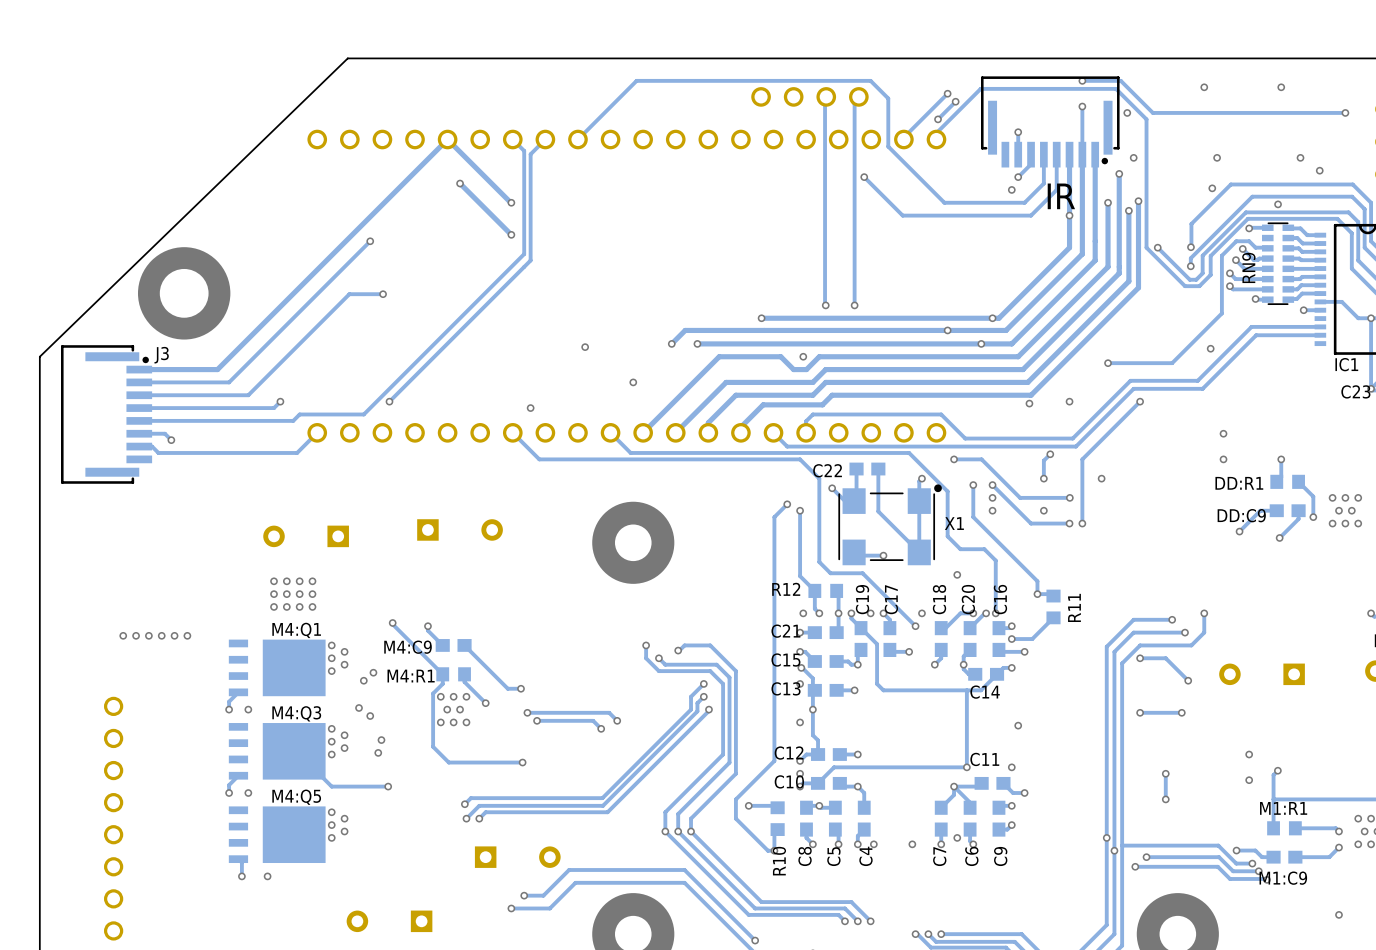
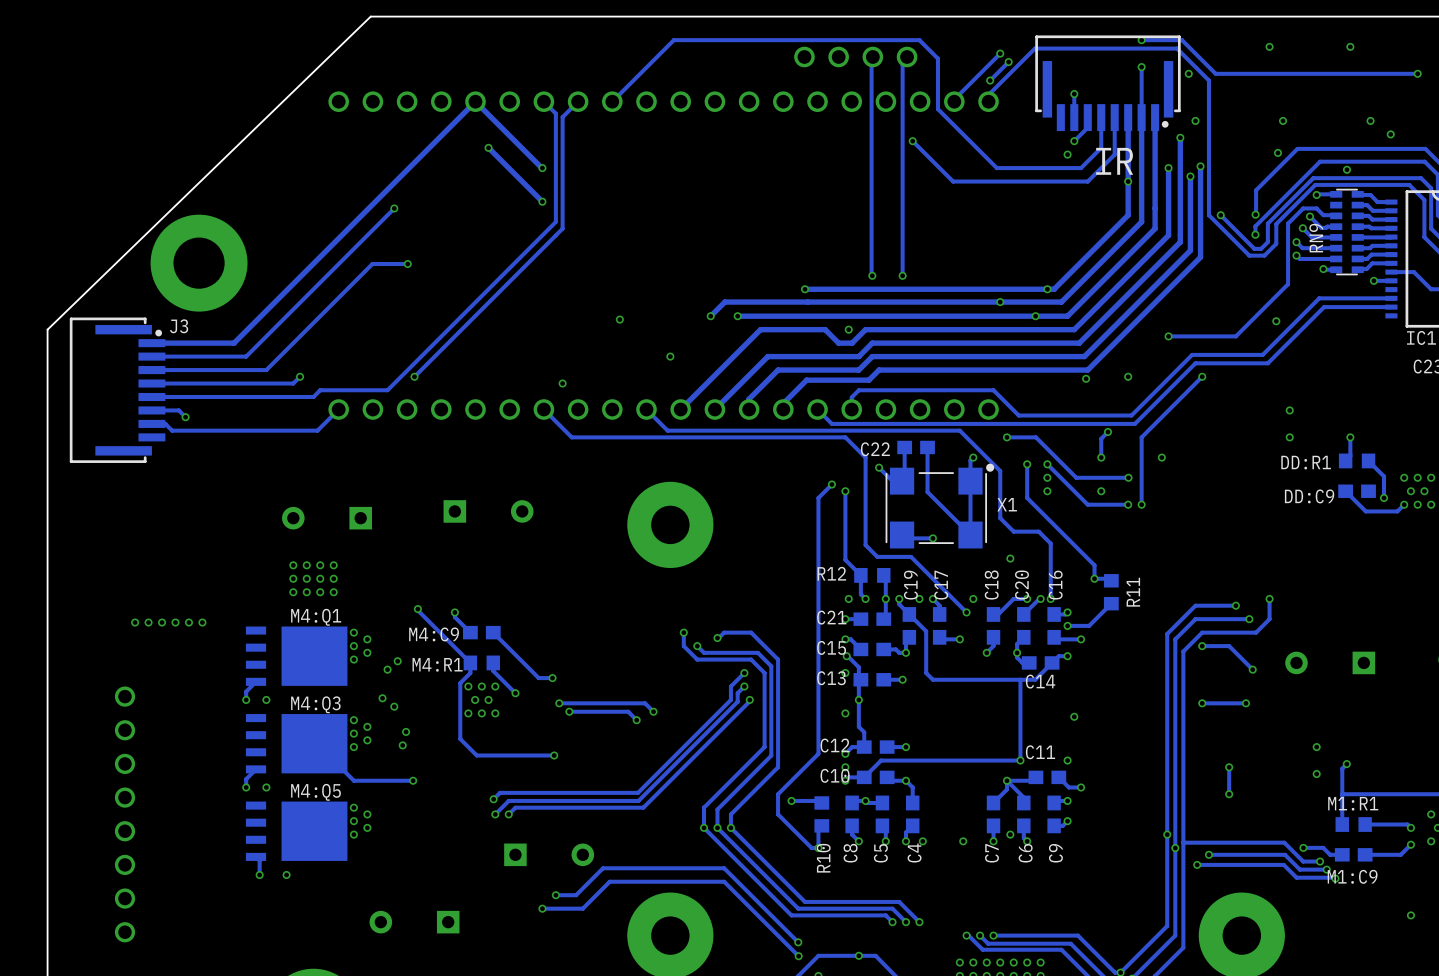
track: (1276, 510) (1260, 510) (1239, 531) -> (1345, 491) (1365, 511) (1397, 511) (1404, 504)
track: (1298, 510) (1298, 519) (1279, 537) -> none
via: (1239, 531) -> none
via: (1279, 537) -> none

